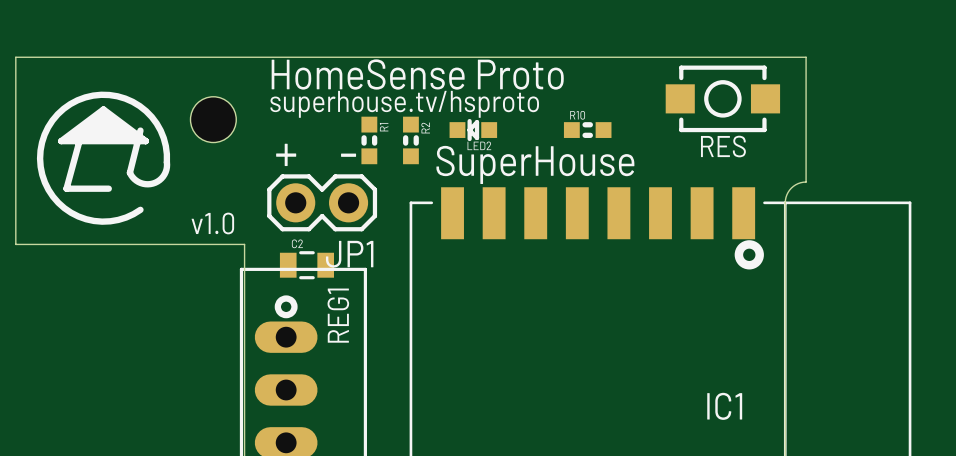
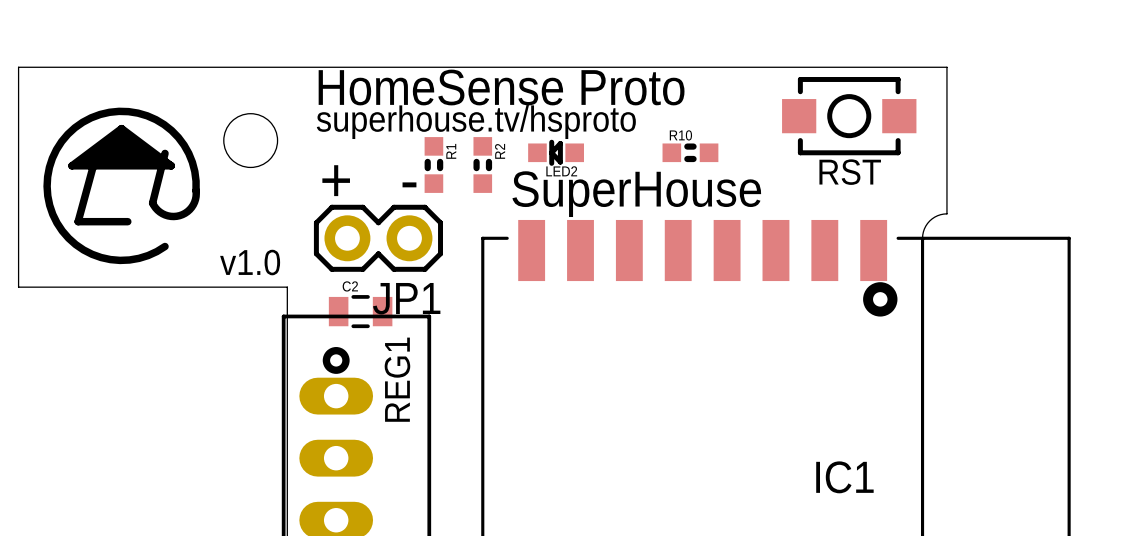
text: RES (723, 146) -> RST (850, 172)

